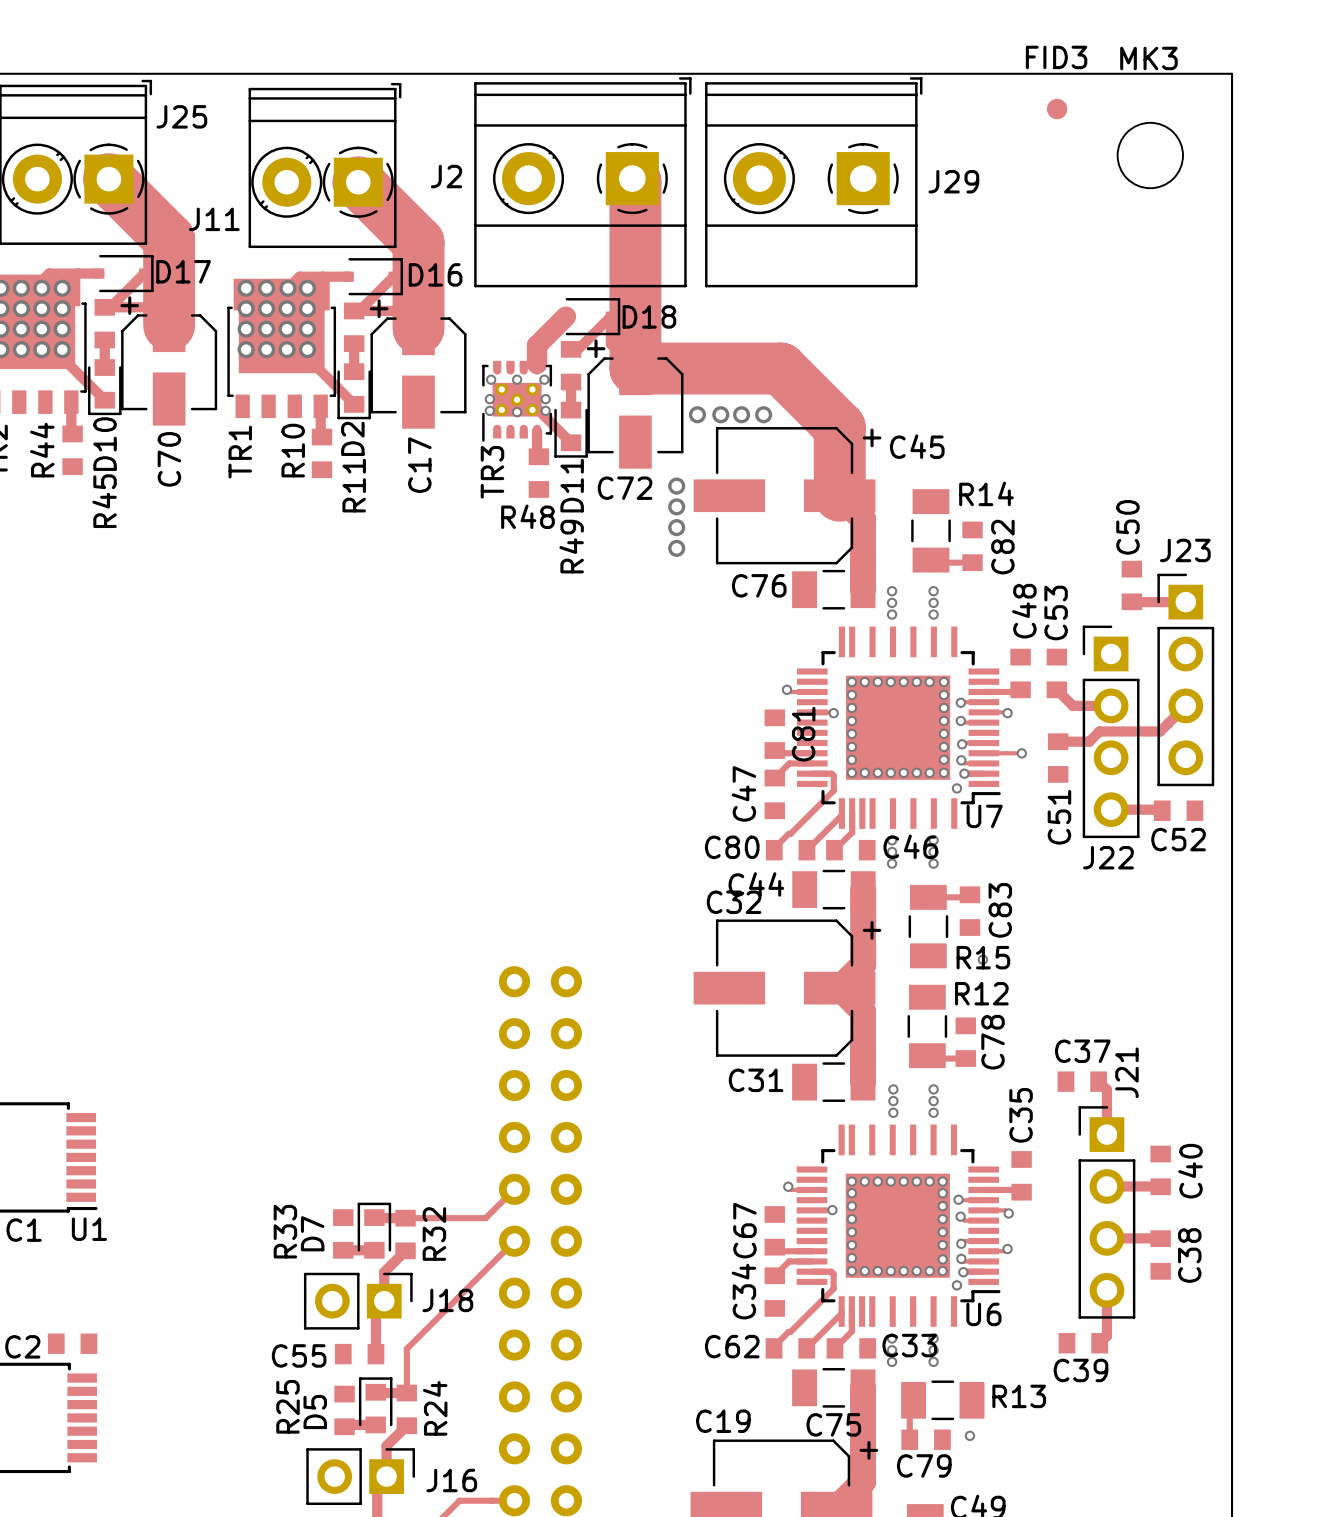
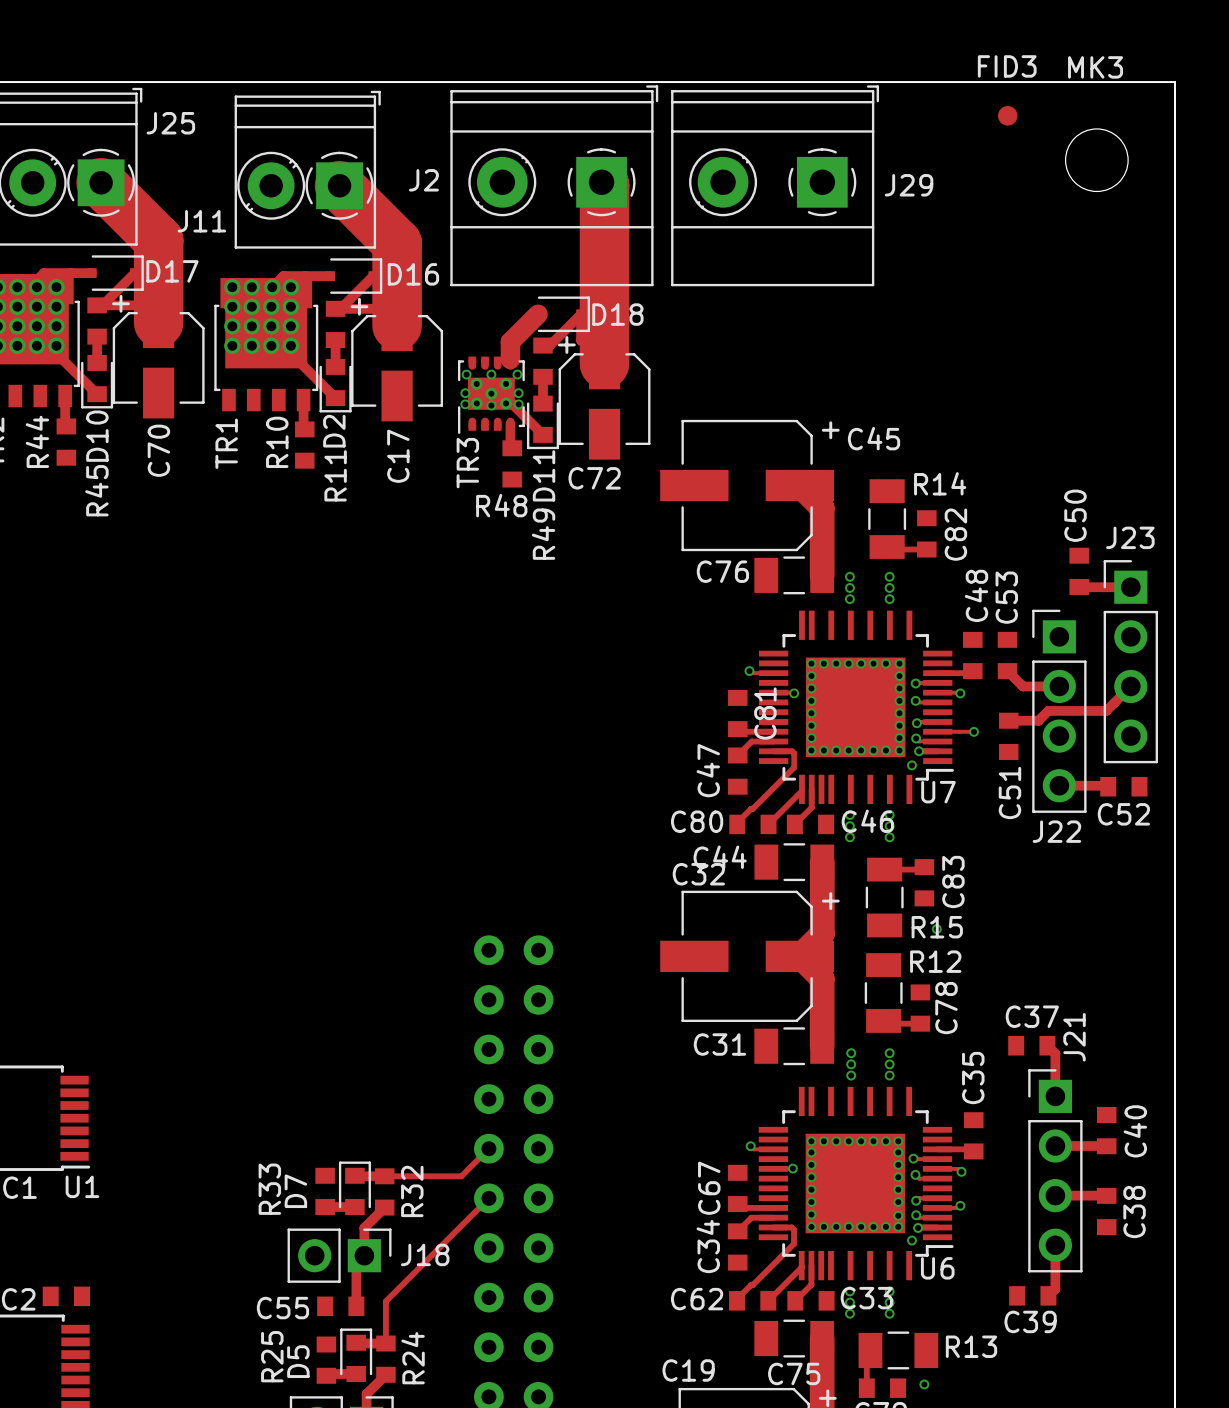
track: (635, 368) (780, 368) (839, 427) (839, 495) -> none
via: (697, 414) -> none
via: (720, 414) -> none
via: (741, 414) -> none
via: (763, 414) -> none
via: (676, 486) -> none
via: (676, 506) -> none
via: (676, 527) -> none
via: (676, 548) -> none

